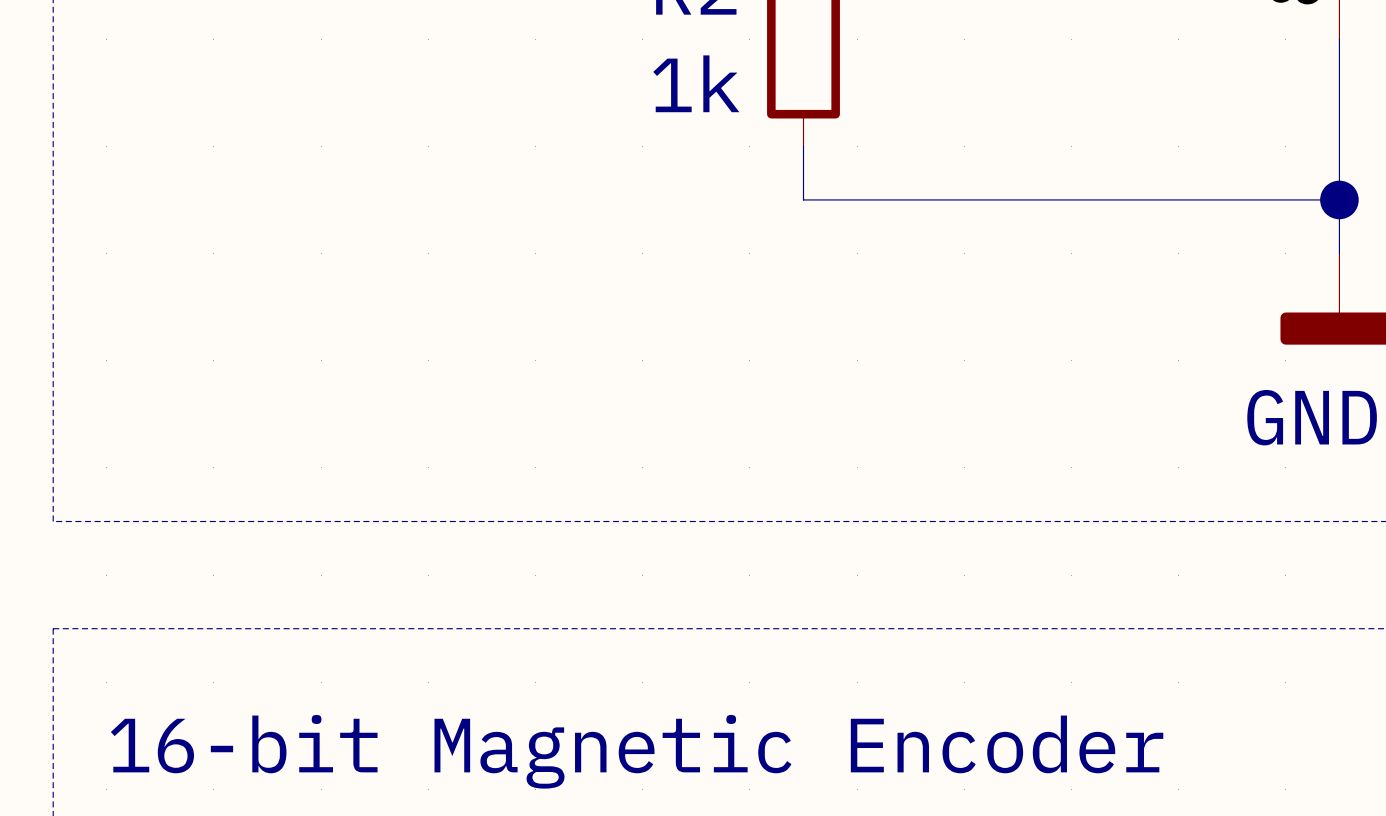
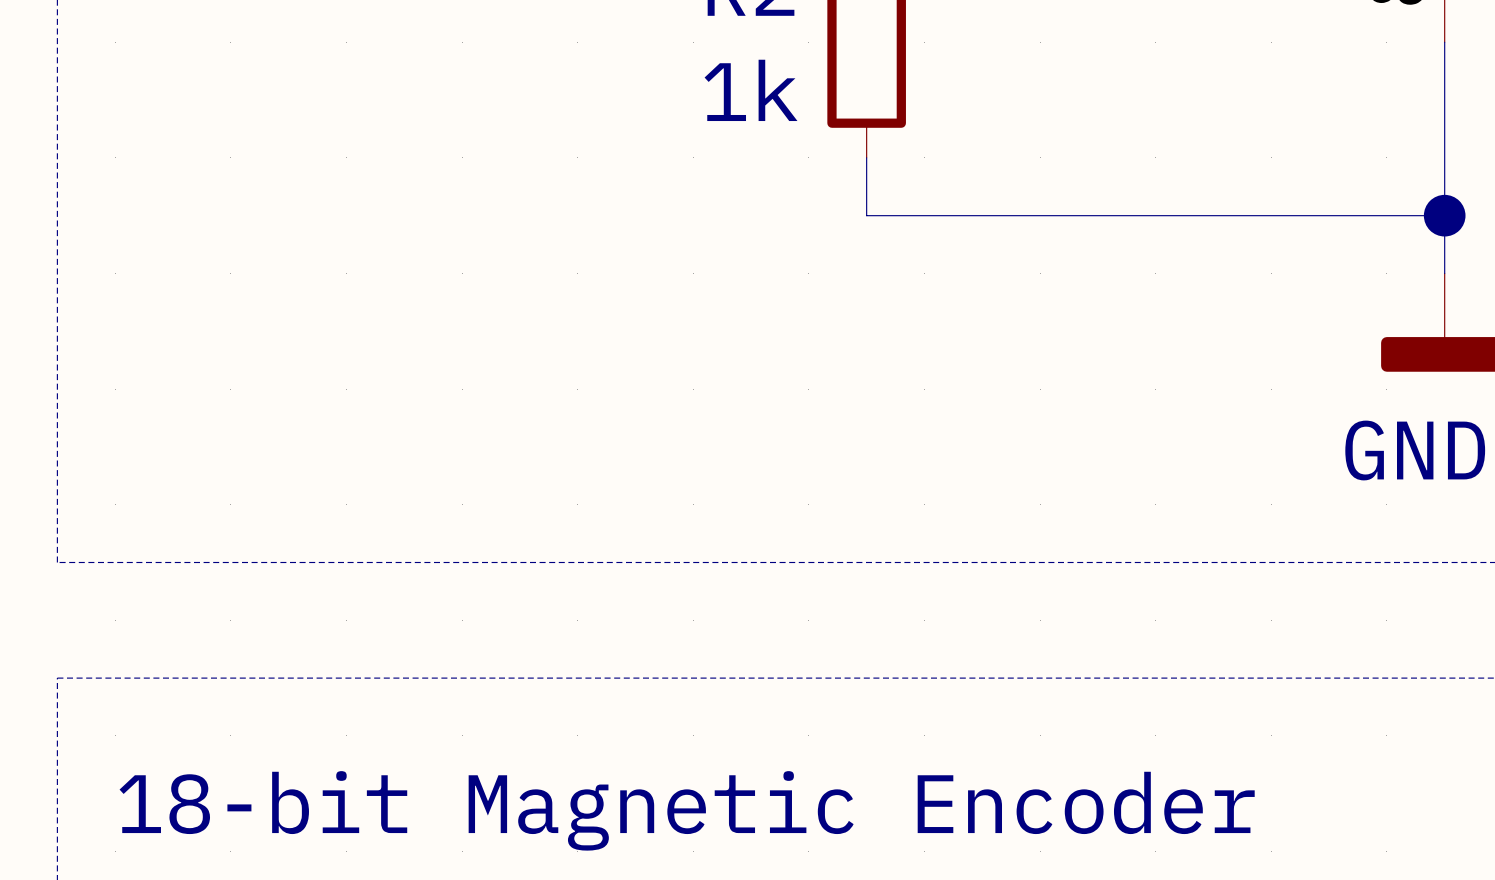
text: 16-bit Magnetic Encoder (637, 751) -> 18-bit Magnetic Encoder (687, 810)

